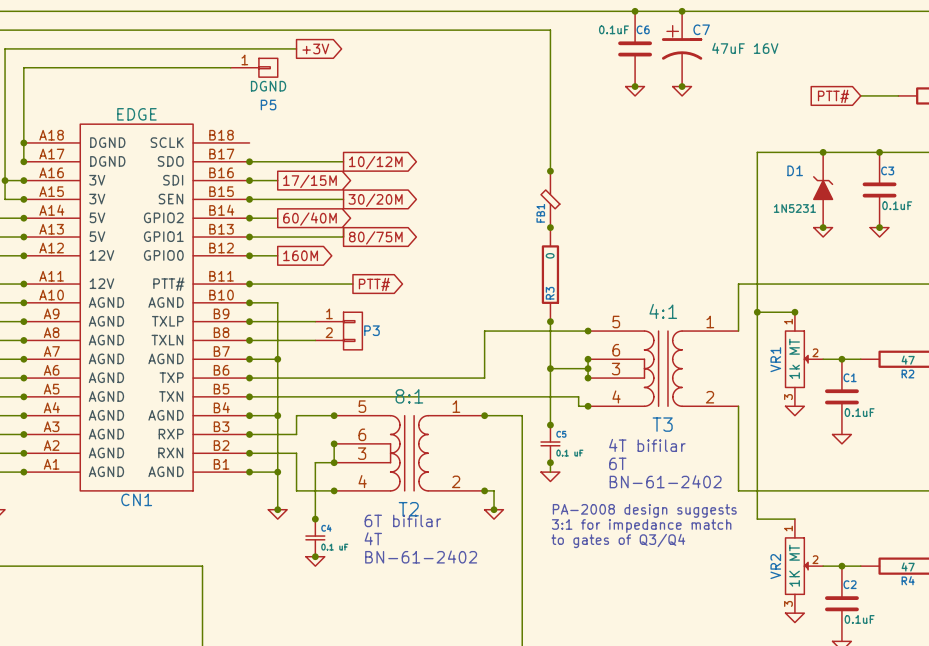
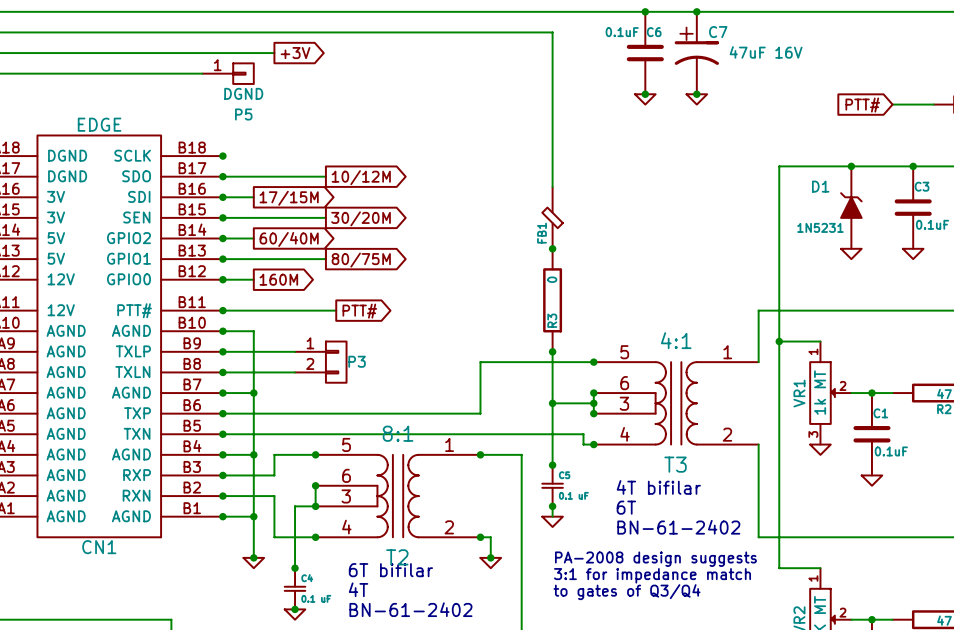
junction: none -> (222, 156)
junction: (550, 171) -> none
junction: (823, 227) -> none
junction: (879, 227) -> none
junction: (794, 312) -> none

